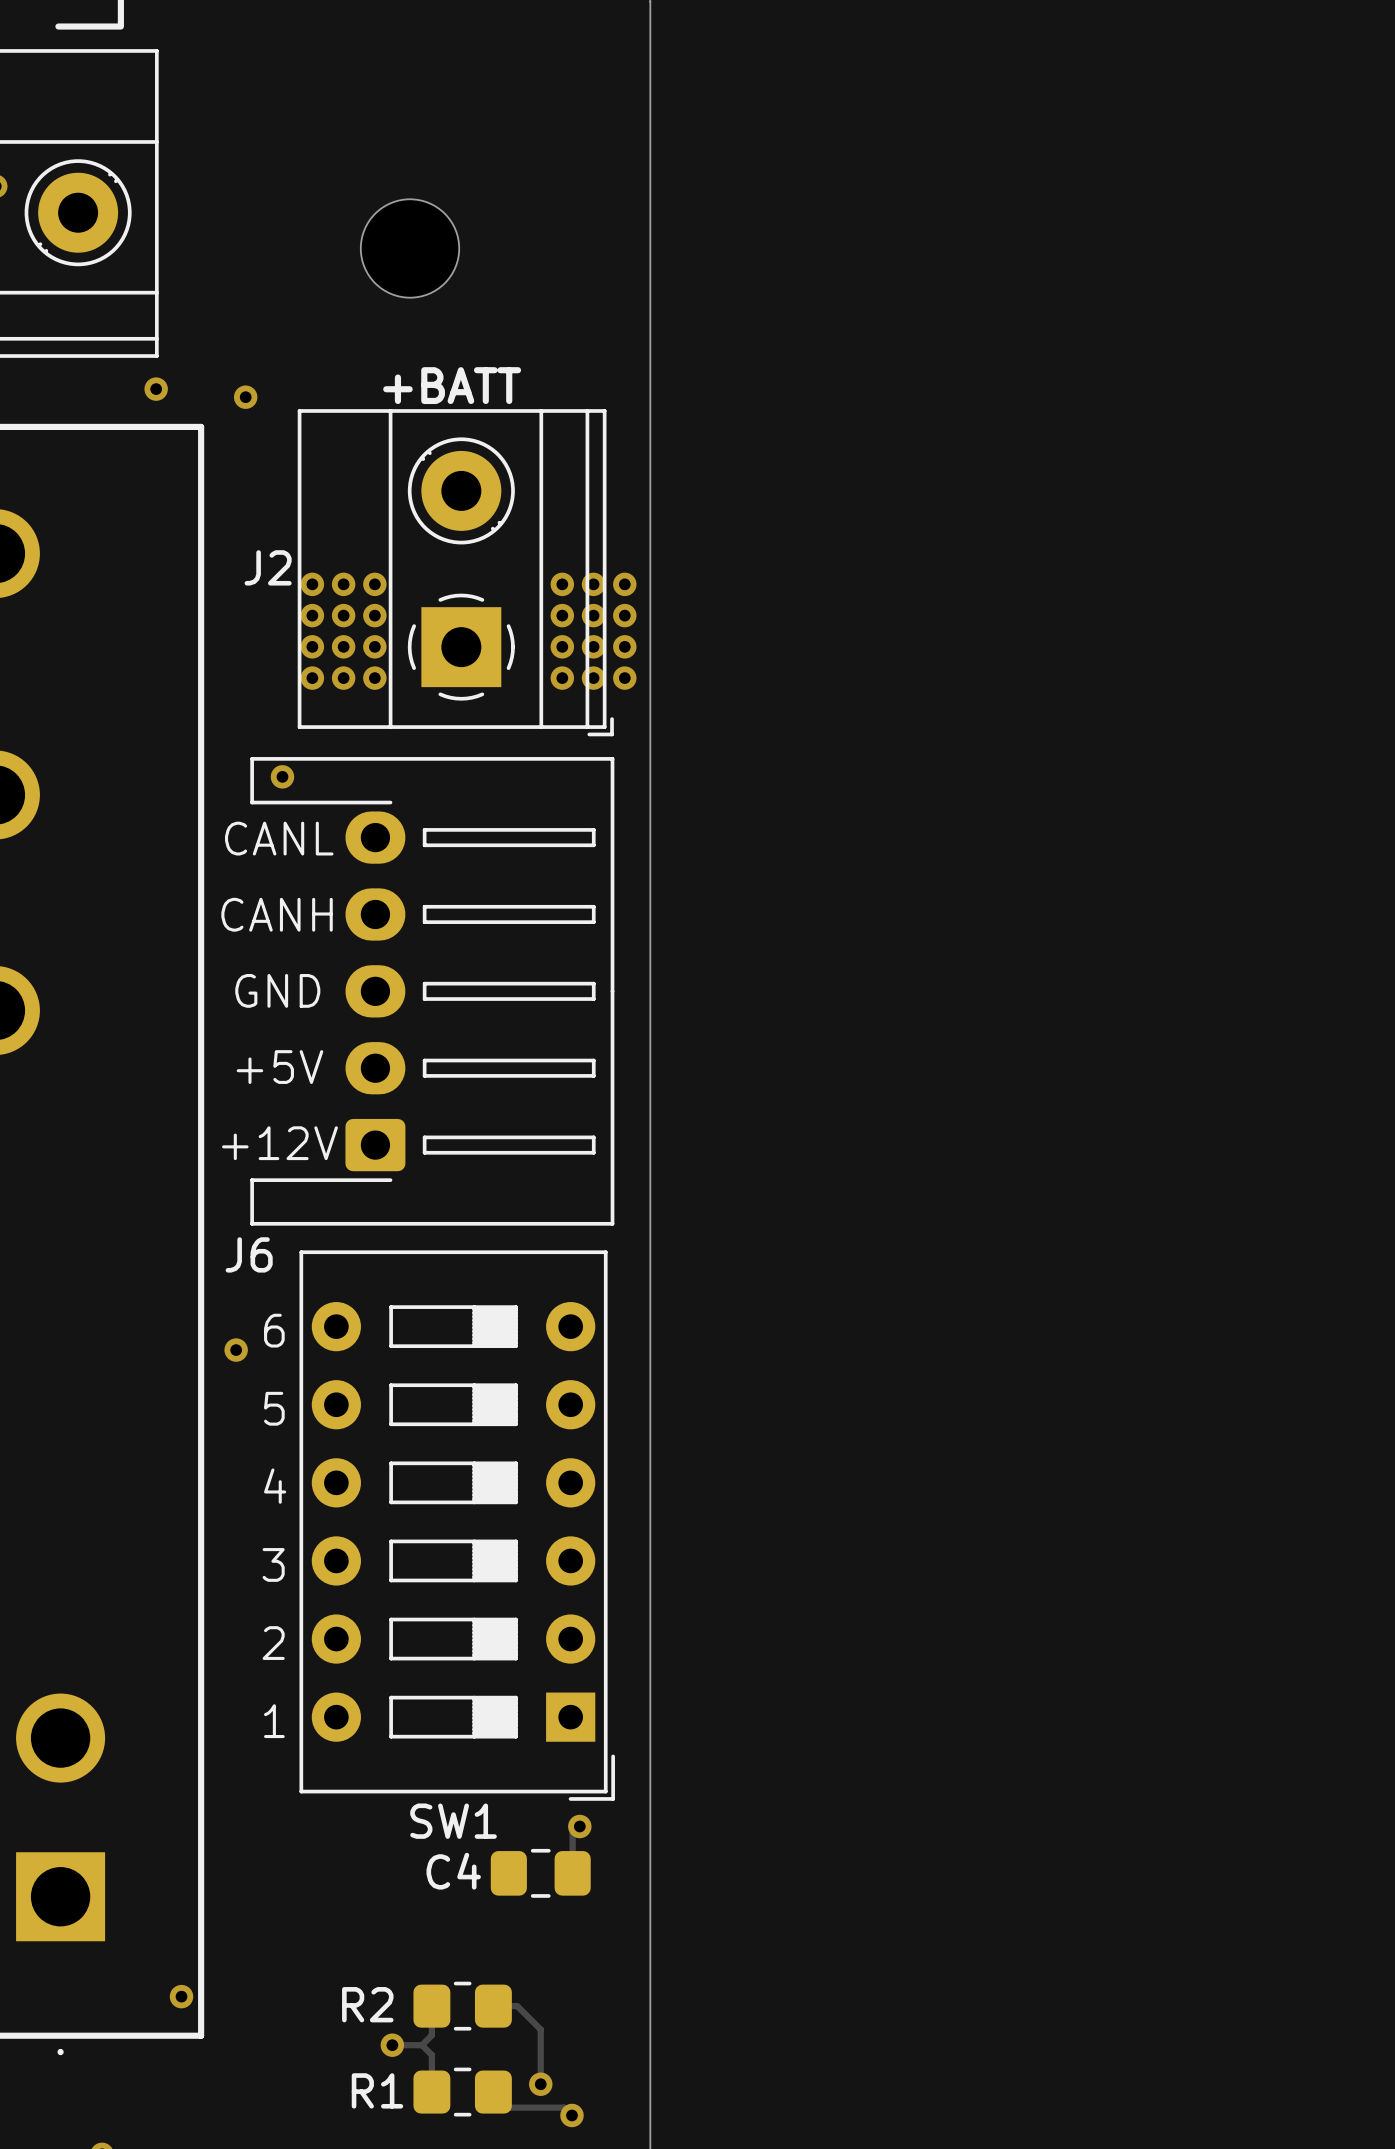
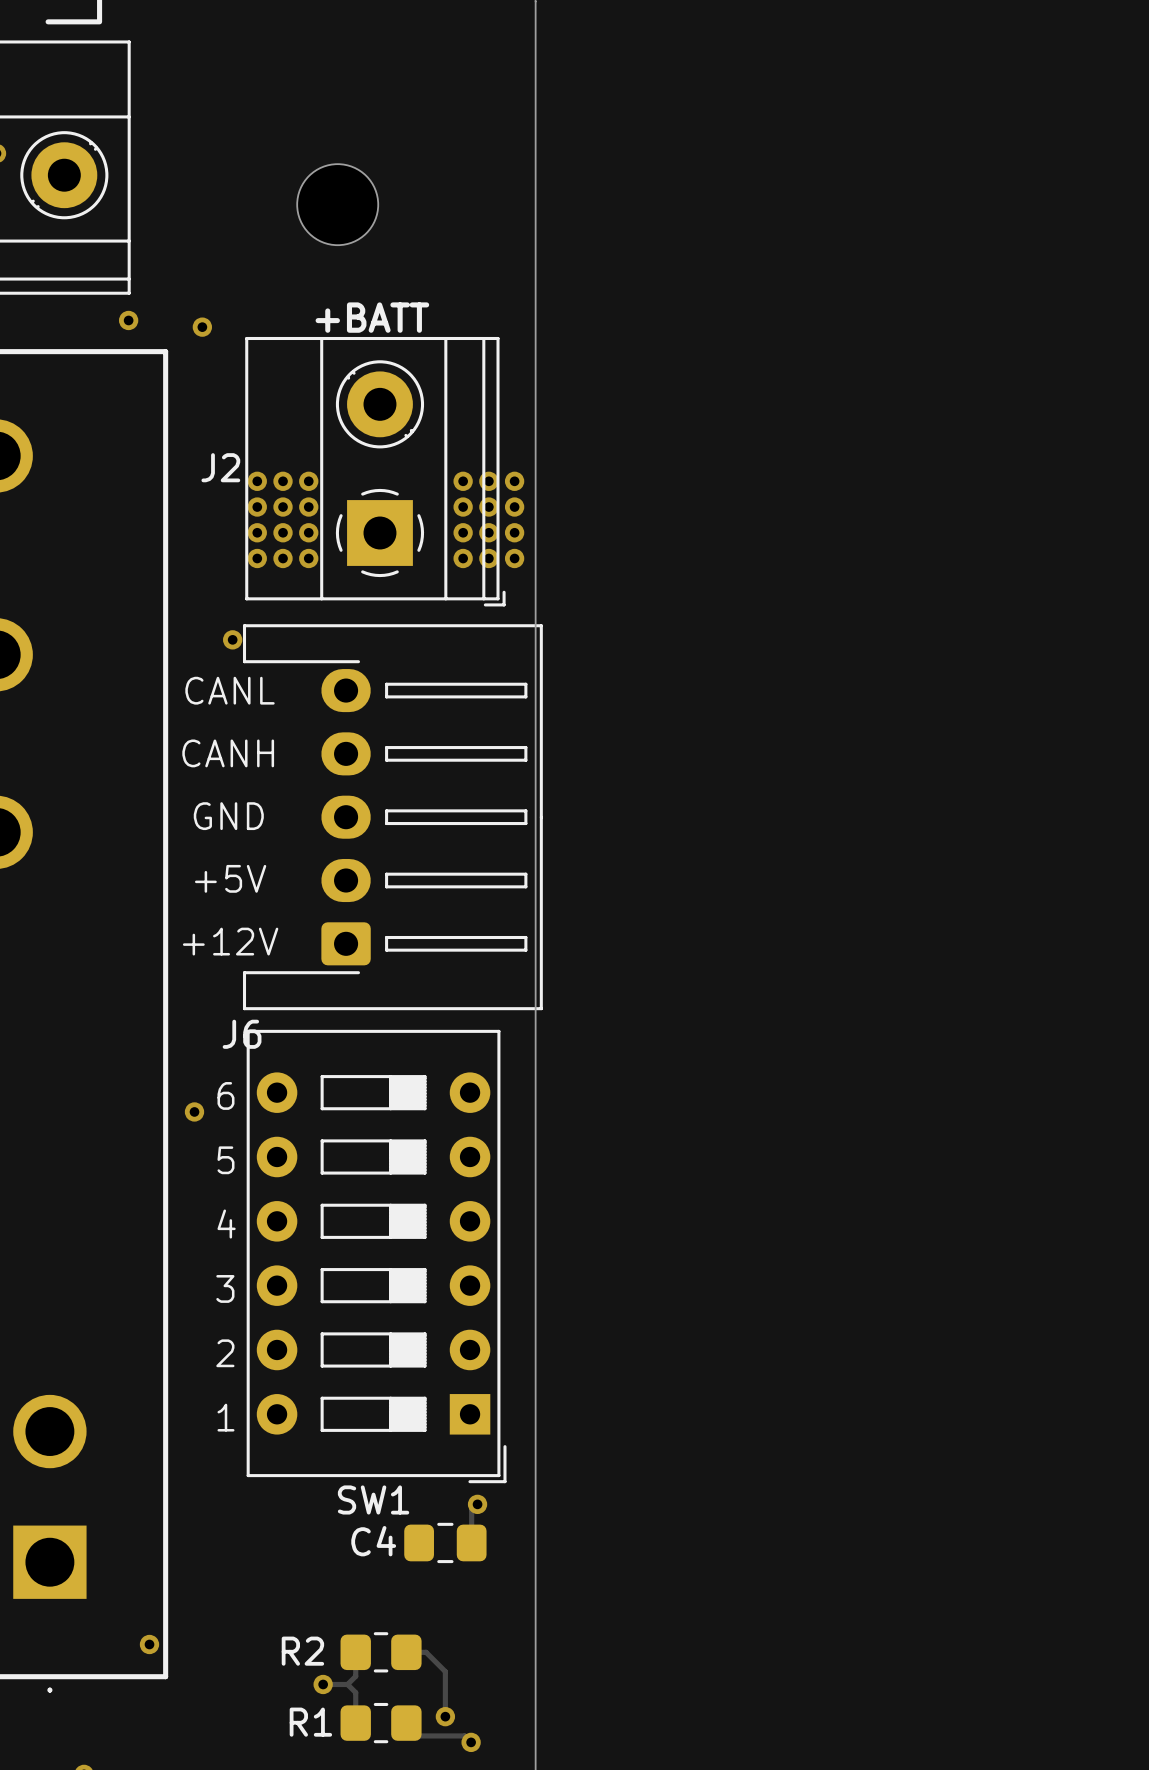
J6 position: (432, 991) -> (392, 817)

